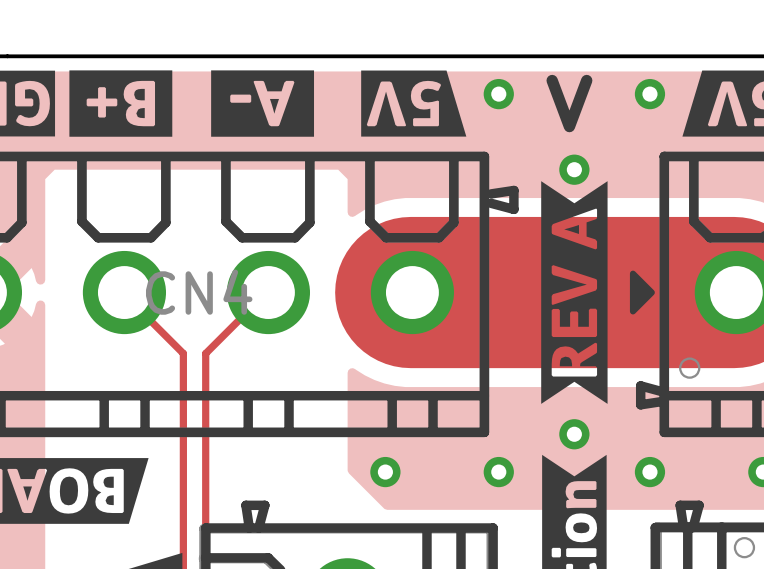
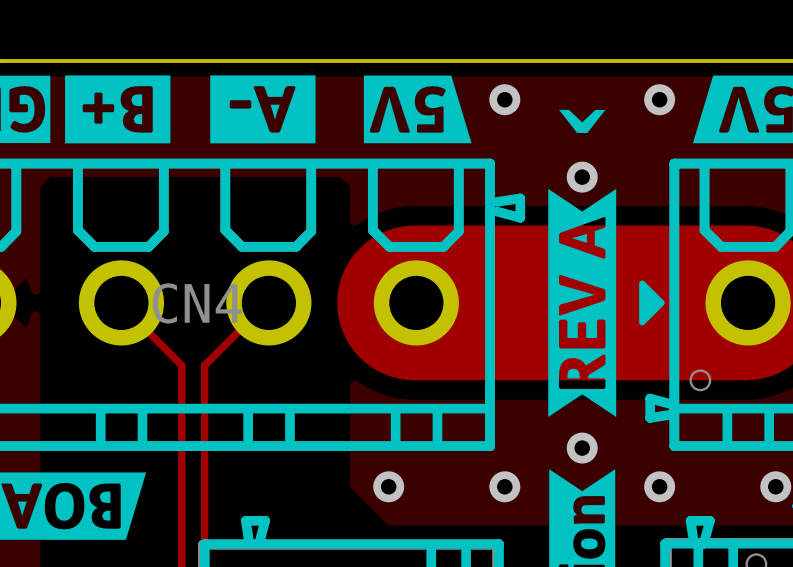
text: > (569, 103) -> ^ (582, 121)

